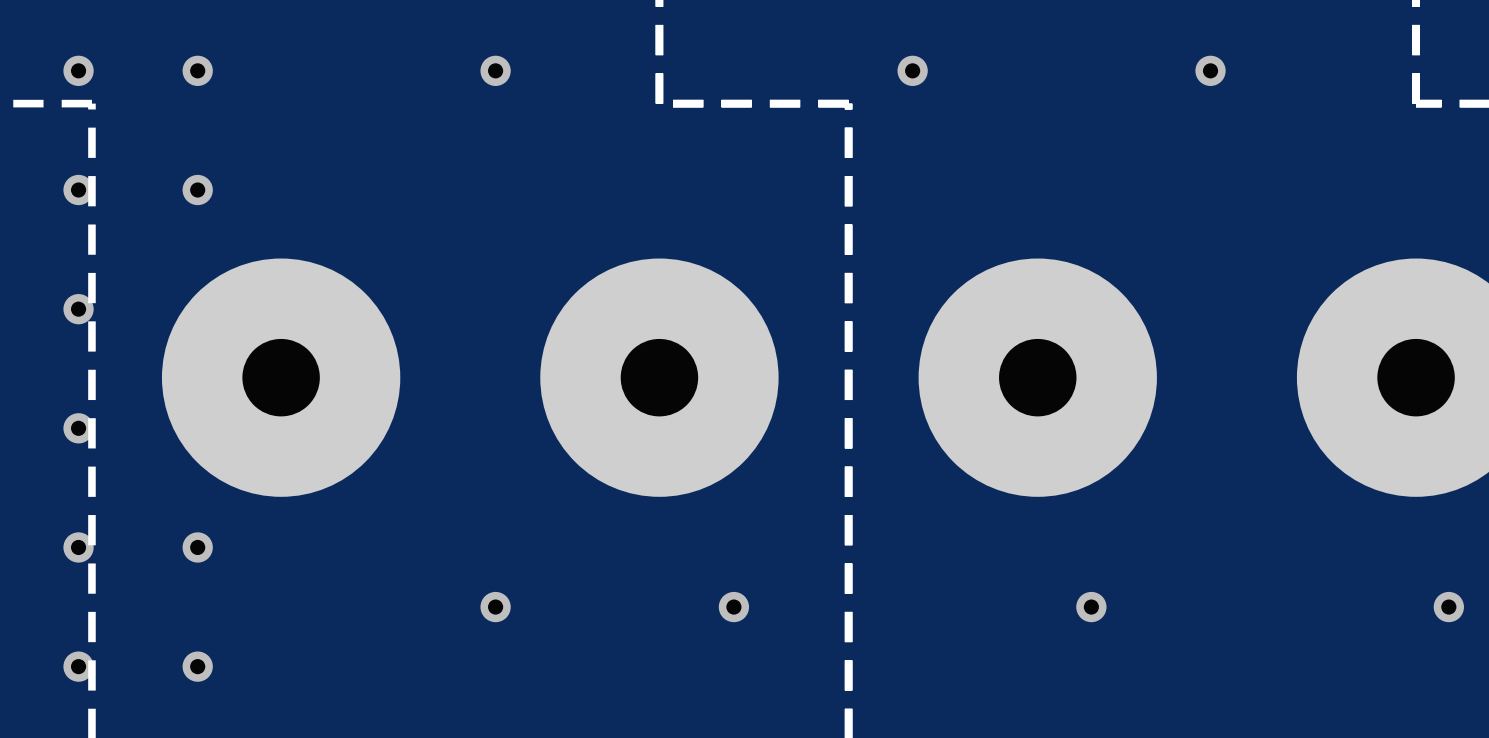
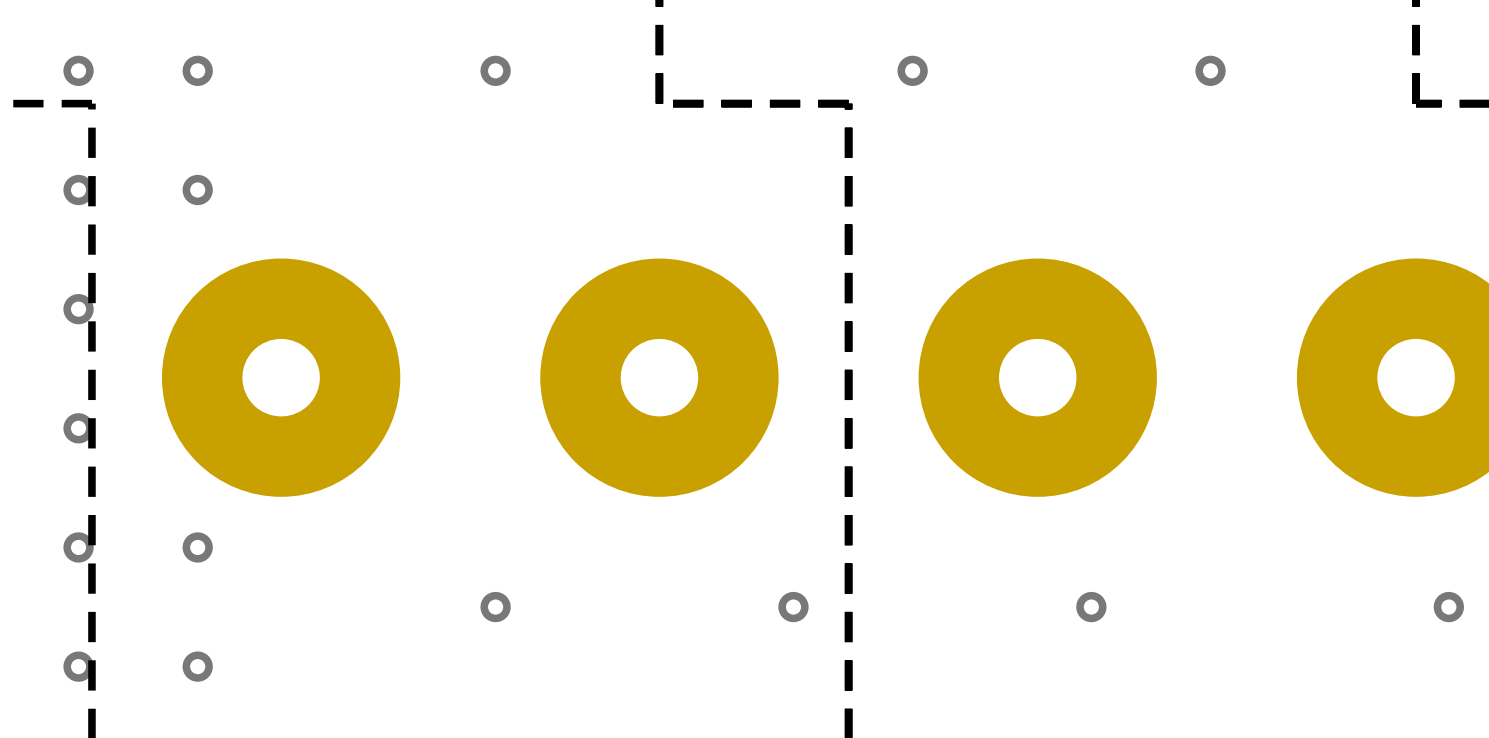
via position: (733, 607) -> (793, 607)

